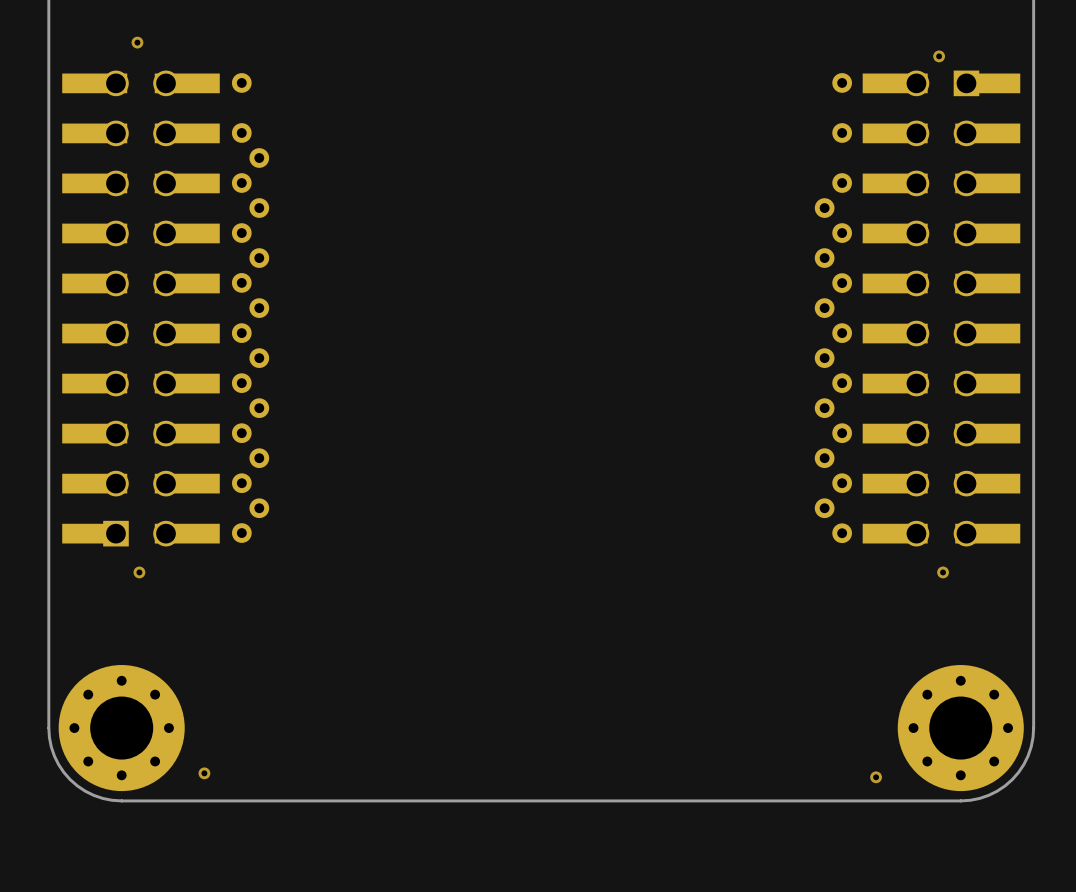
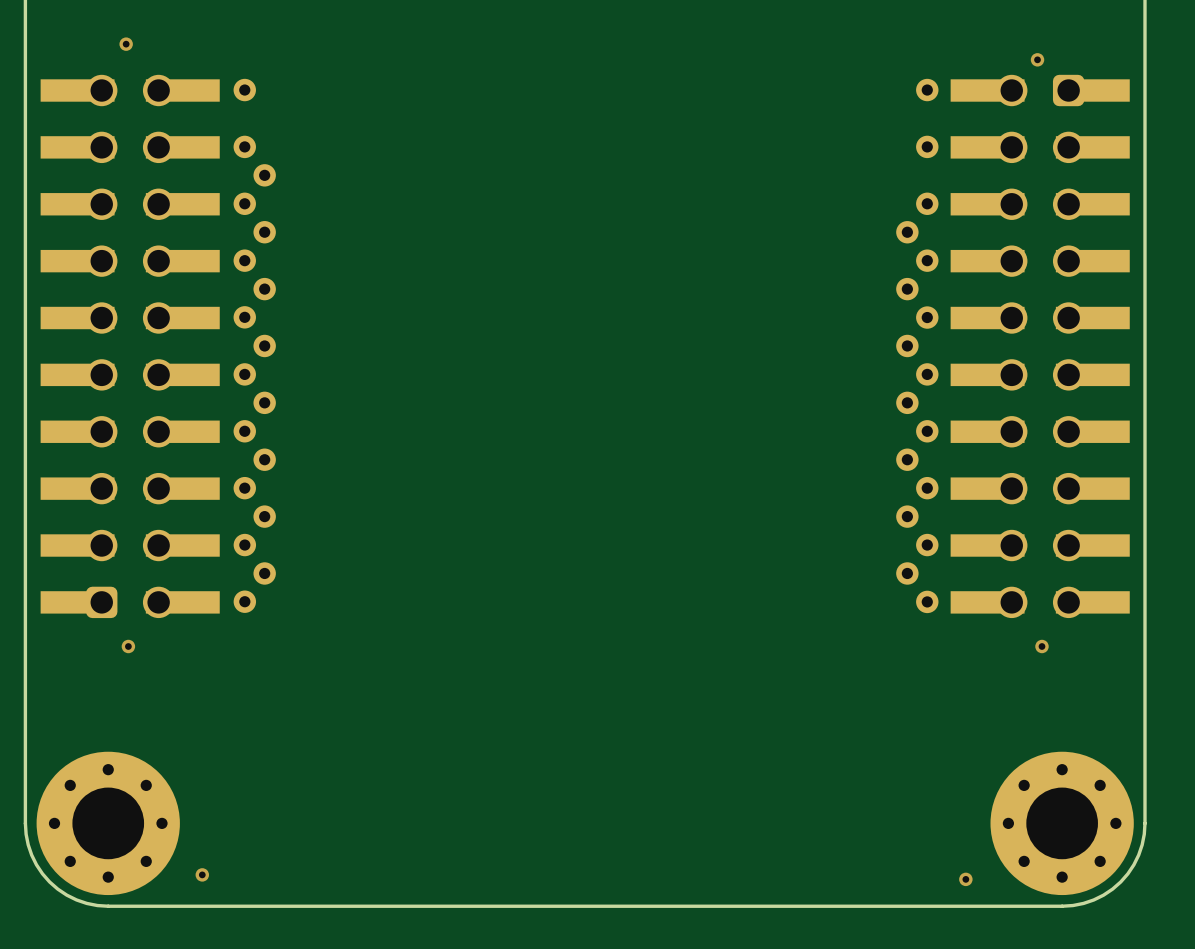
part footprint: [62, 70, 220, 547] -> [40, 74, 220, 619]
part footprint: [862, 70, 1021, 547] -> [950, 74, 1130, 619]

